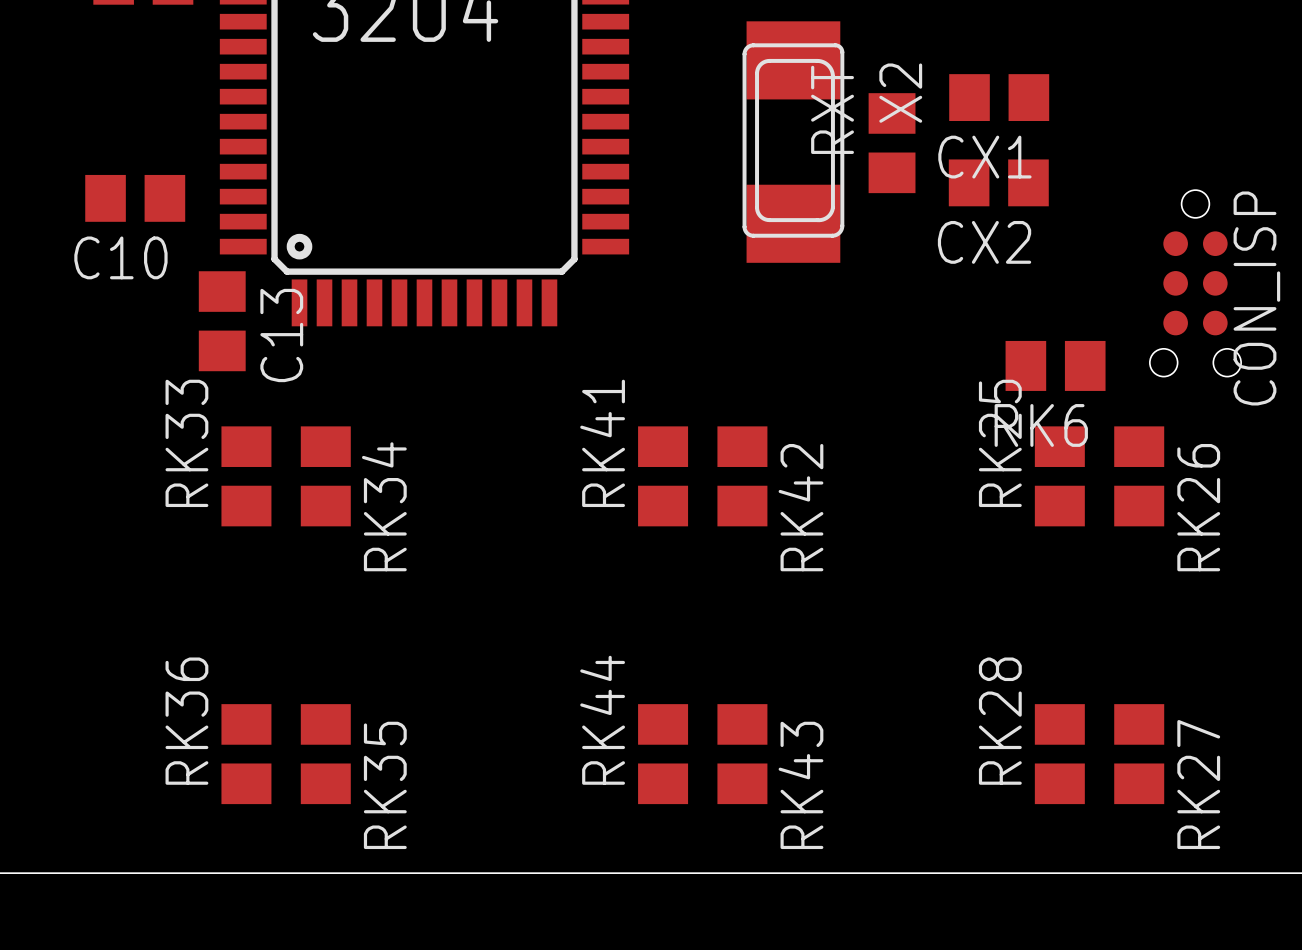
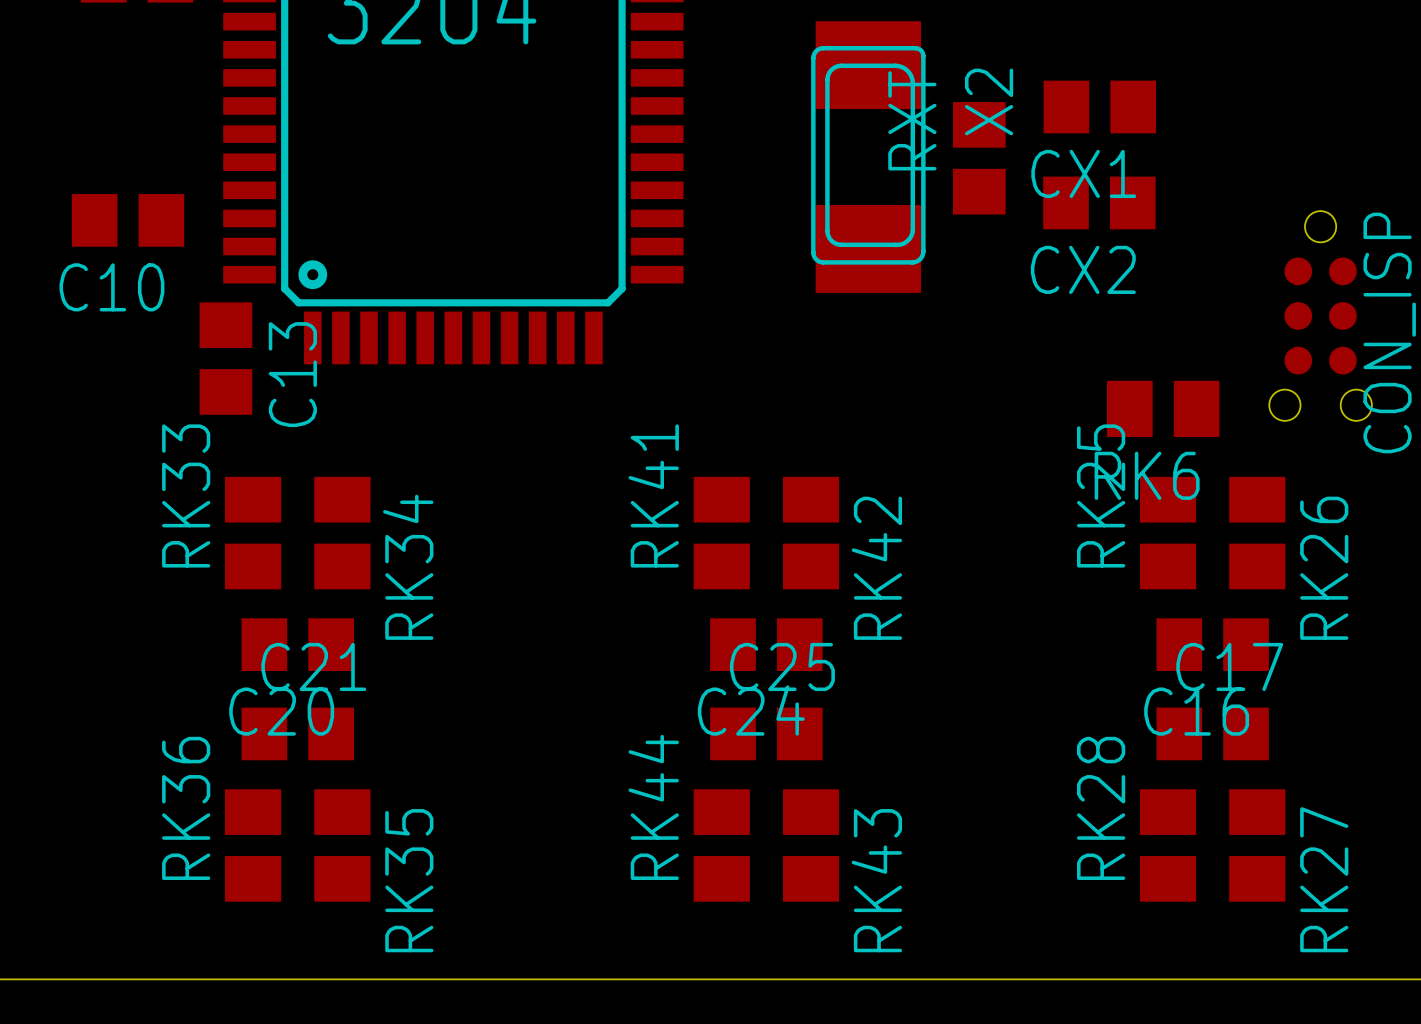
C20: none -> (297, 644)
C24: none -> (766, 644)
C16: none -> (1212, 644)
C21: none -> (297, 733)
C25: none -> (766, 733)
C17: none -> (1212, 733)

